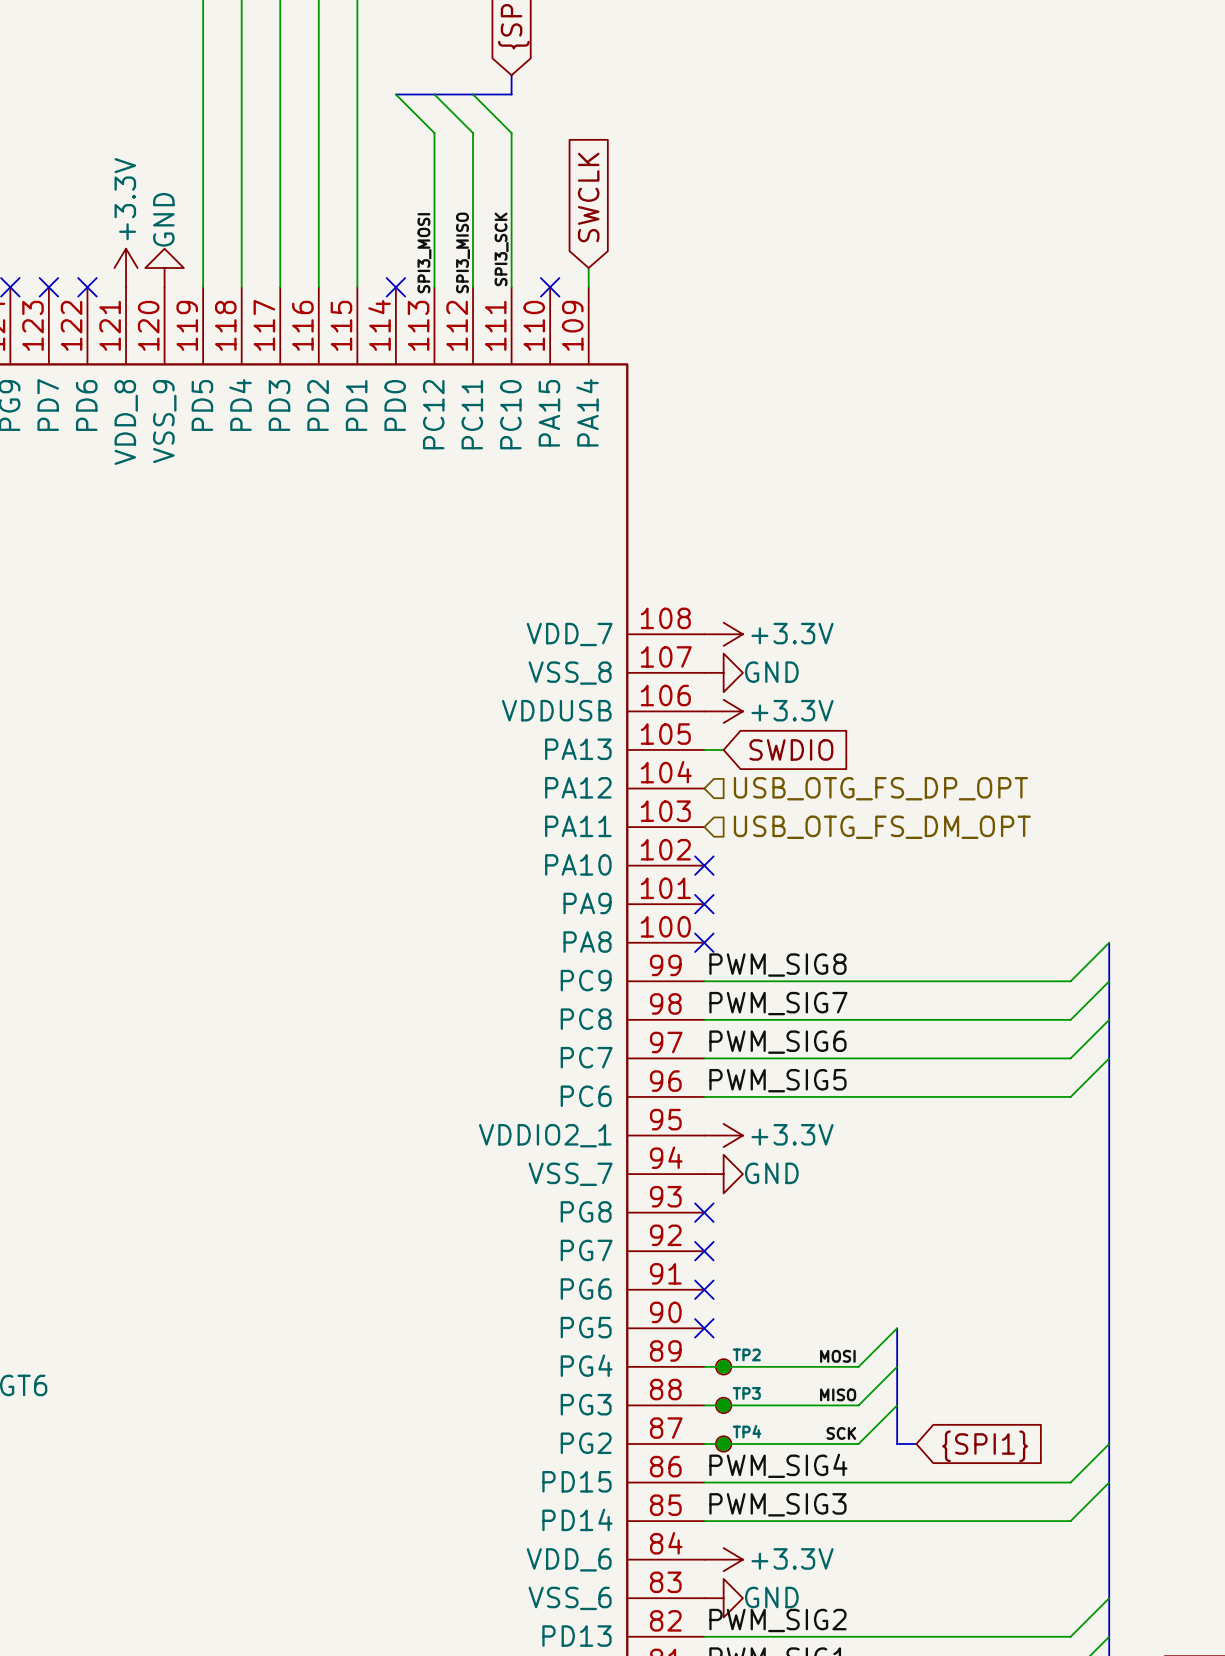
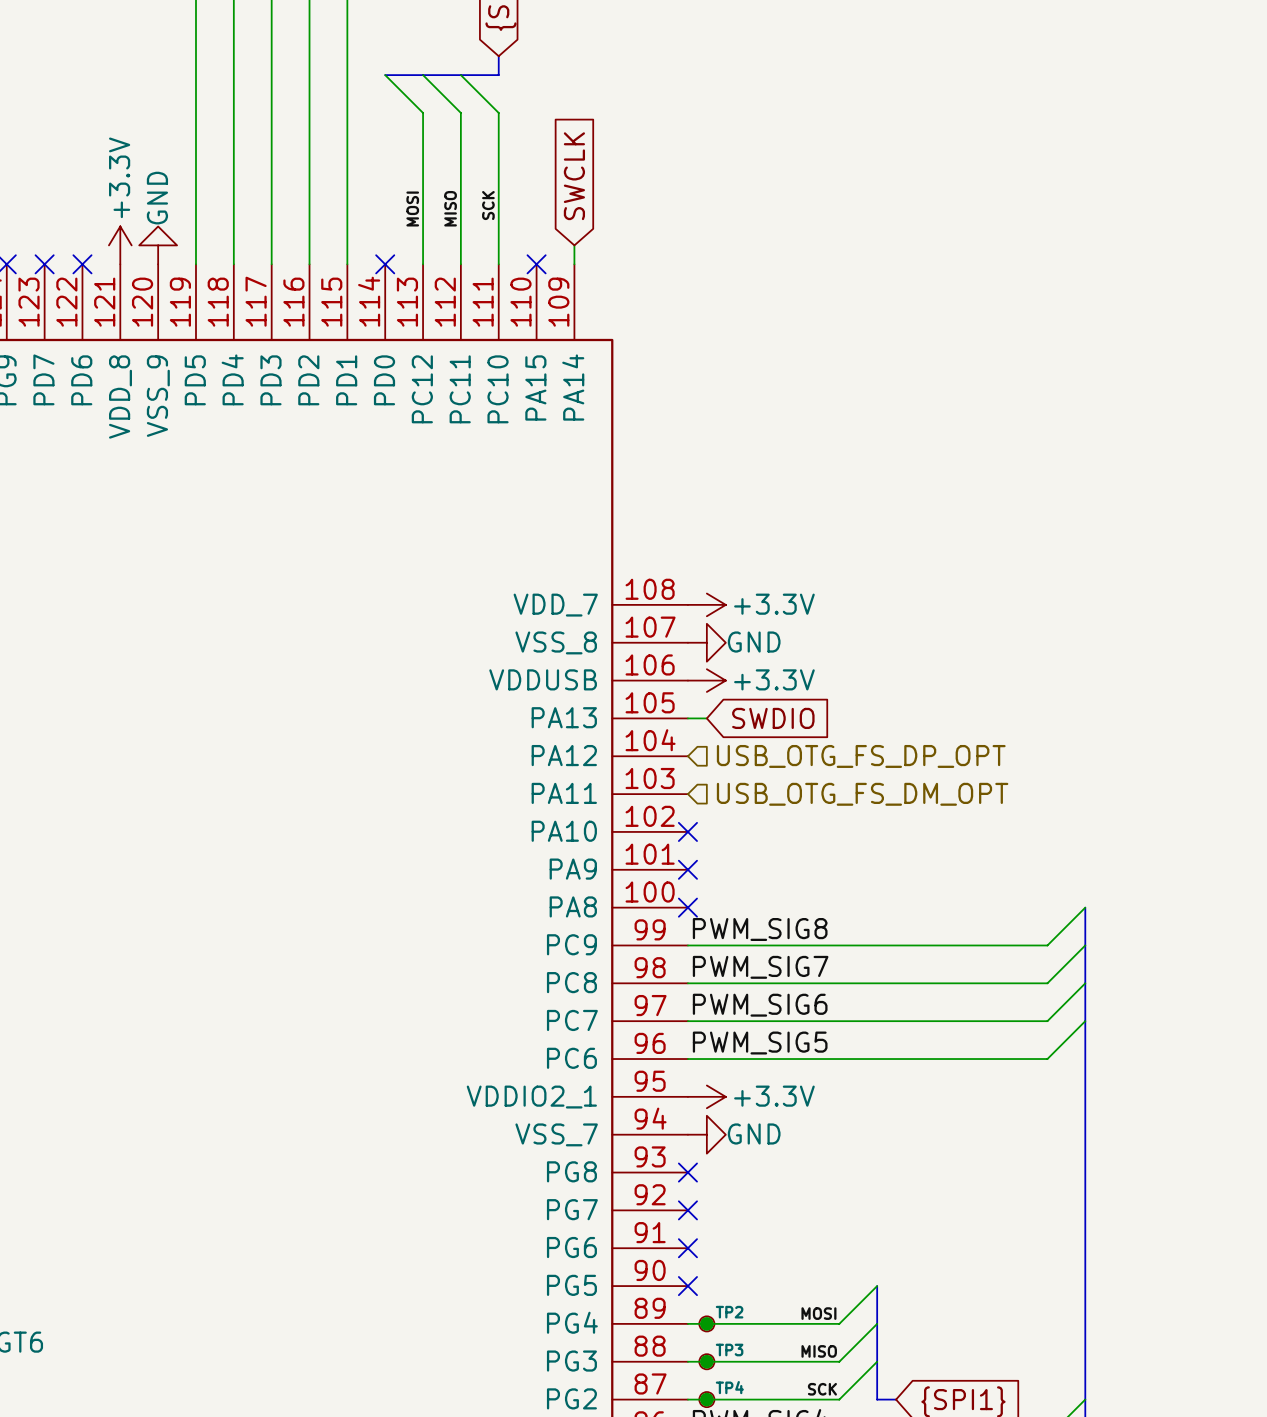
label: SPI3_SCK (501, 249) -> SCK (488, 205)
label: SPI3_MISO (463, 252) -> MISO (450, 208)
label: SPI3_MOSI (424, 253) -> MOSI (412, 208)

